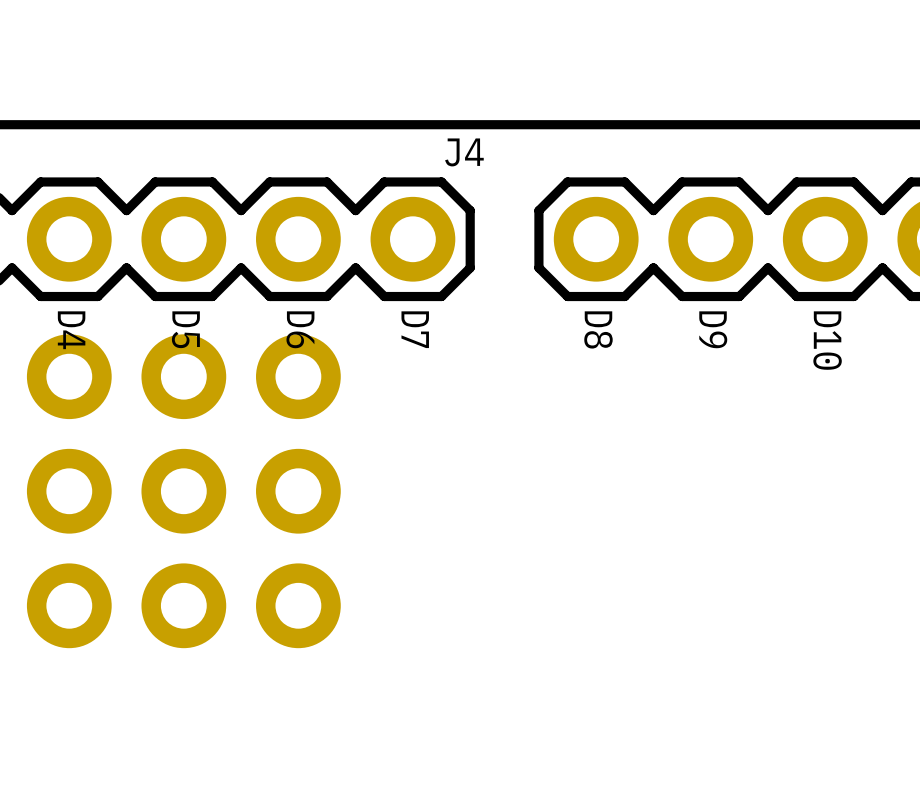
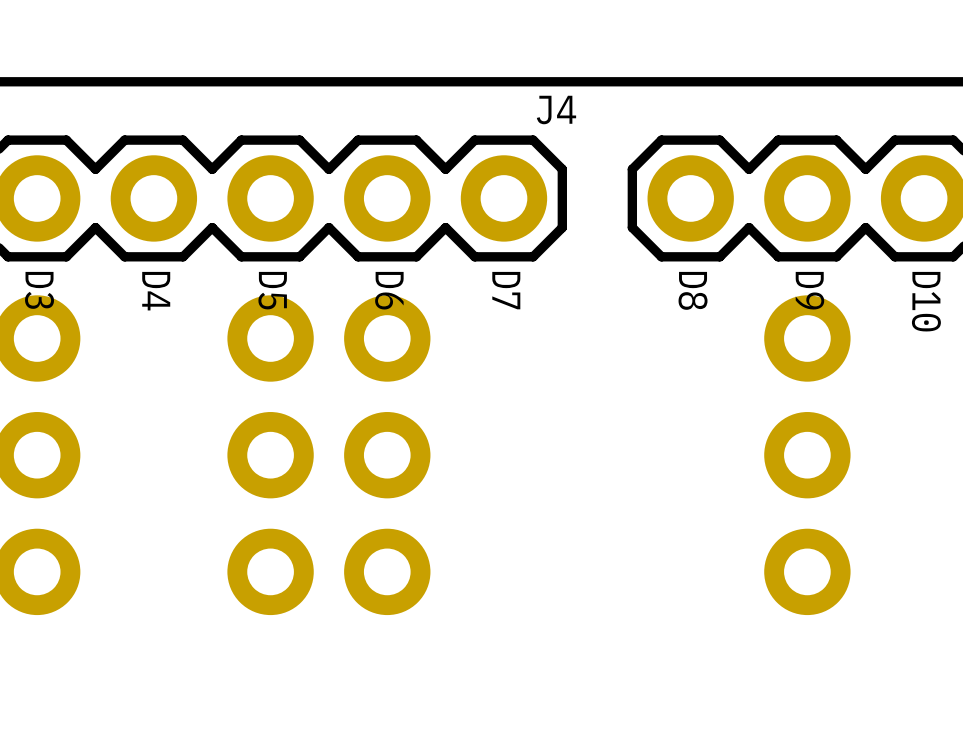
part position: (69, 491) -> (807, 455)

